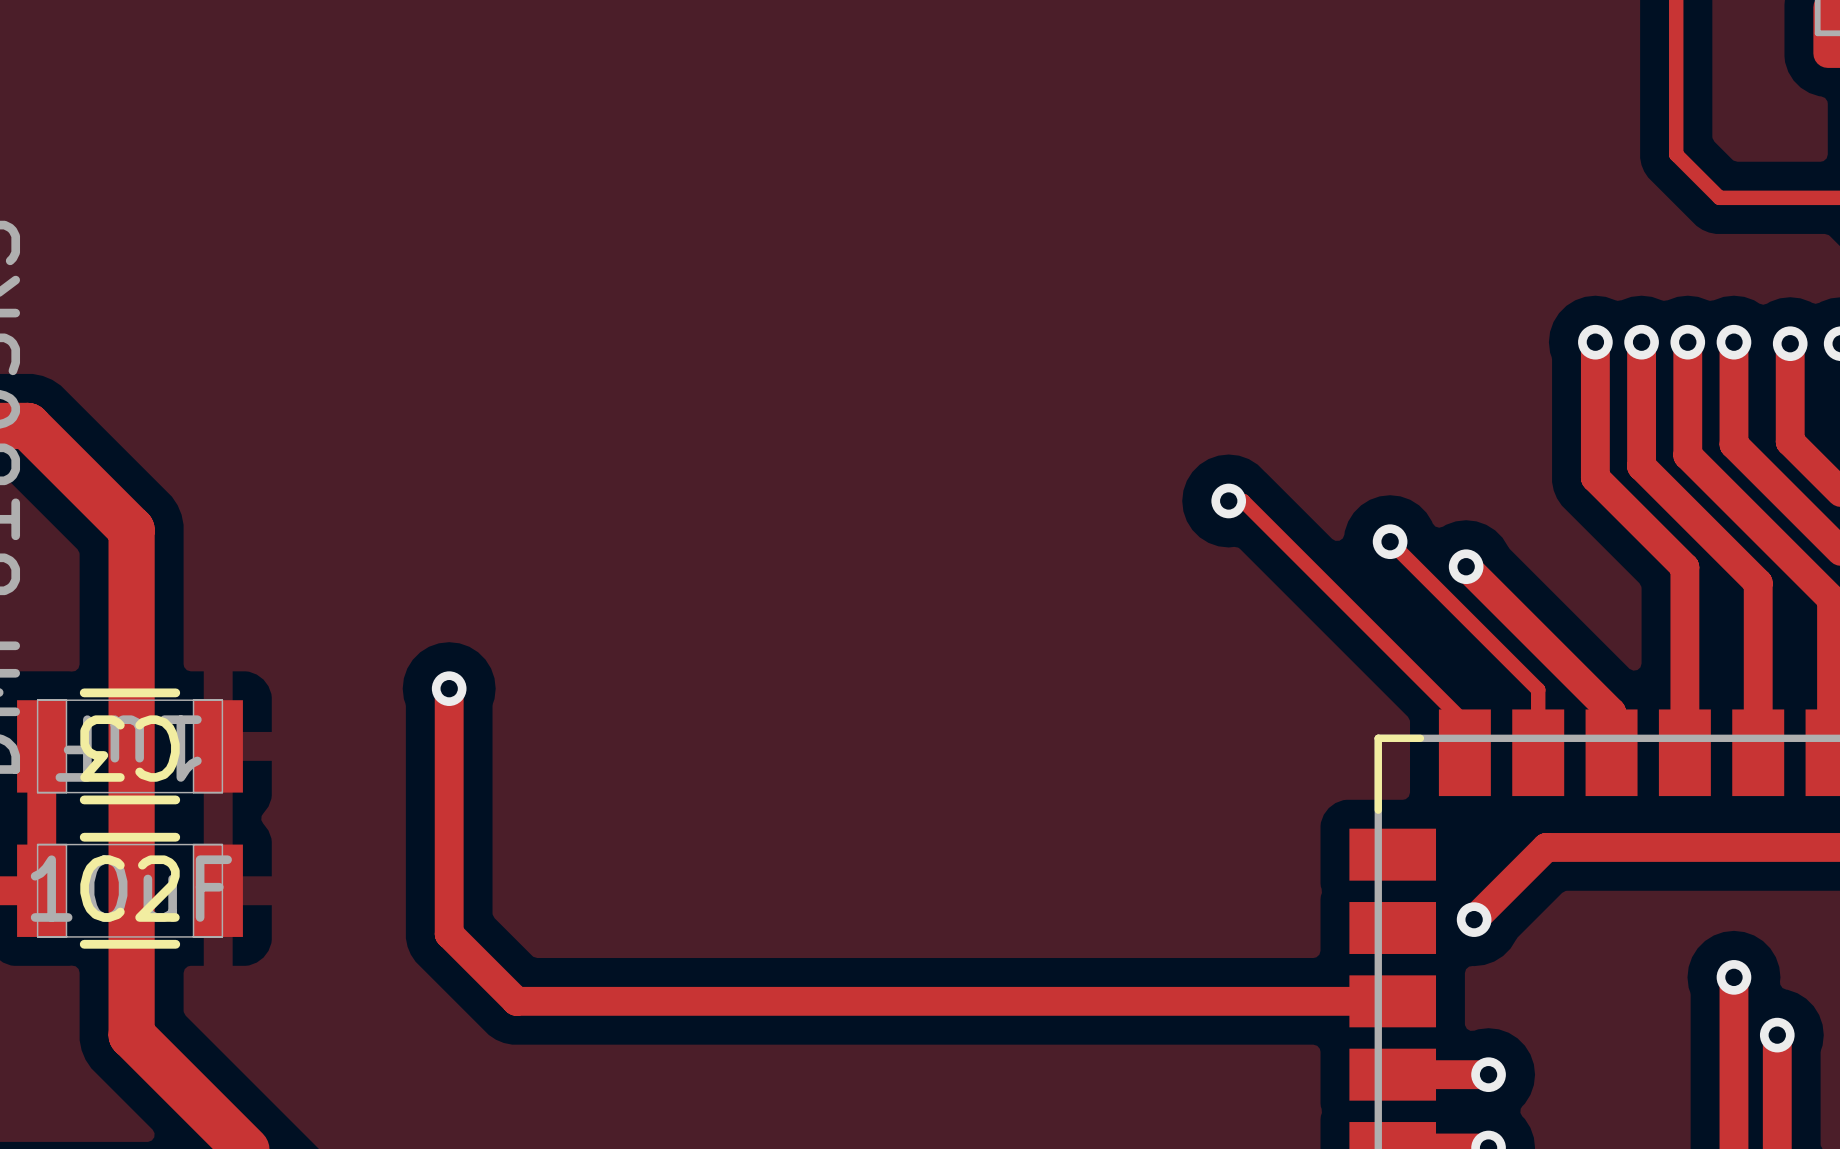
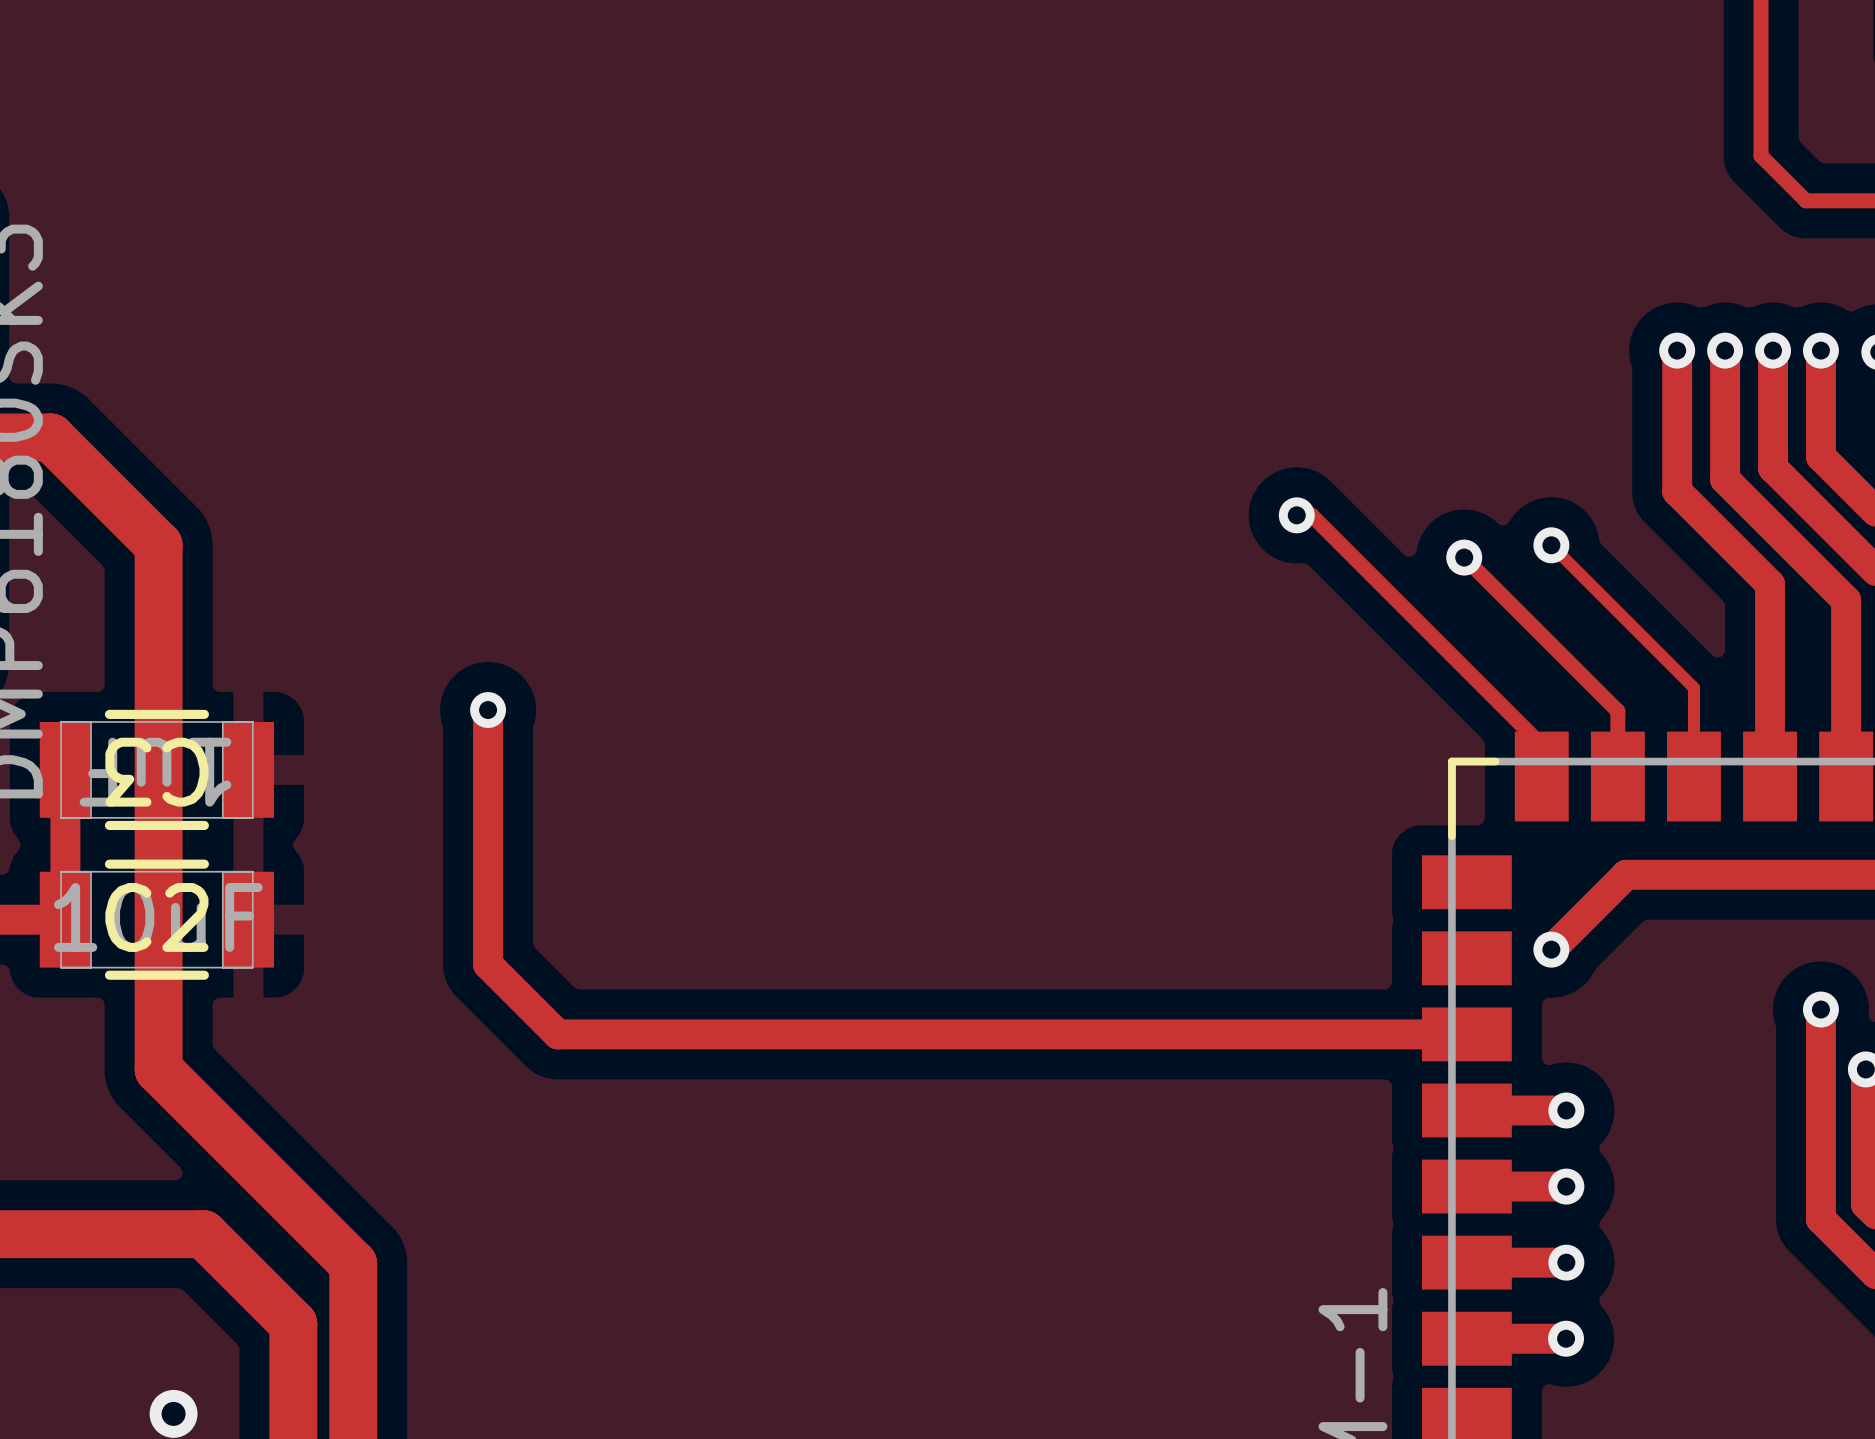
track: (1466, 566) (1611, 712) -> (1551, 545) (1693, 687) (1693, 734)
via position: (1466, 566) -> (1551, 545)

